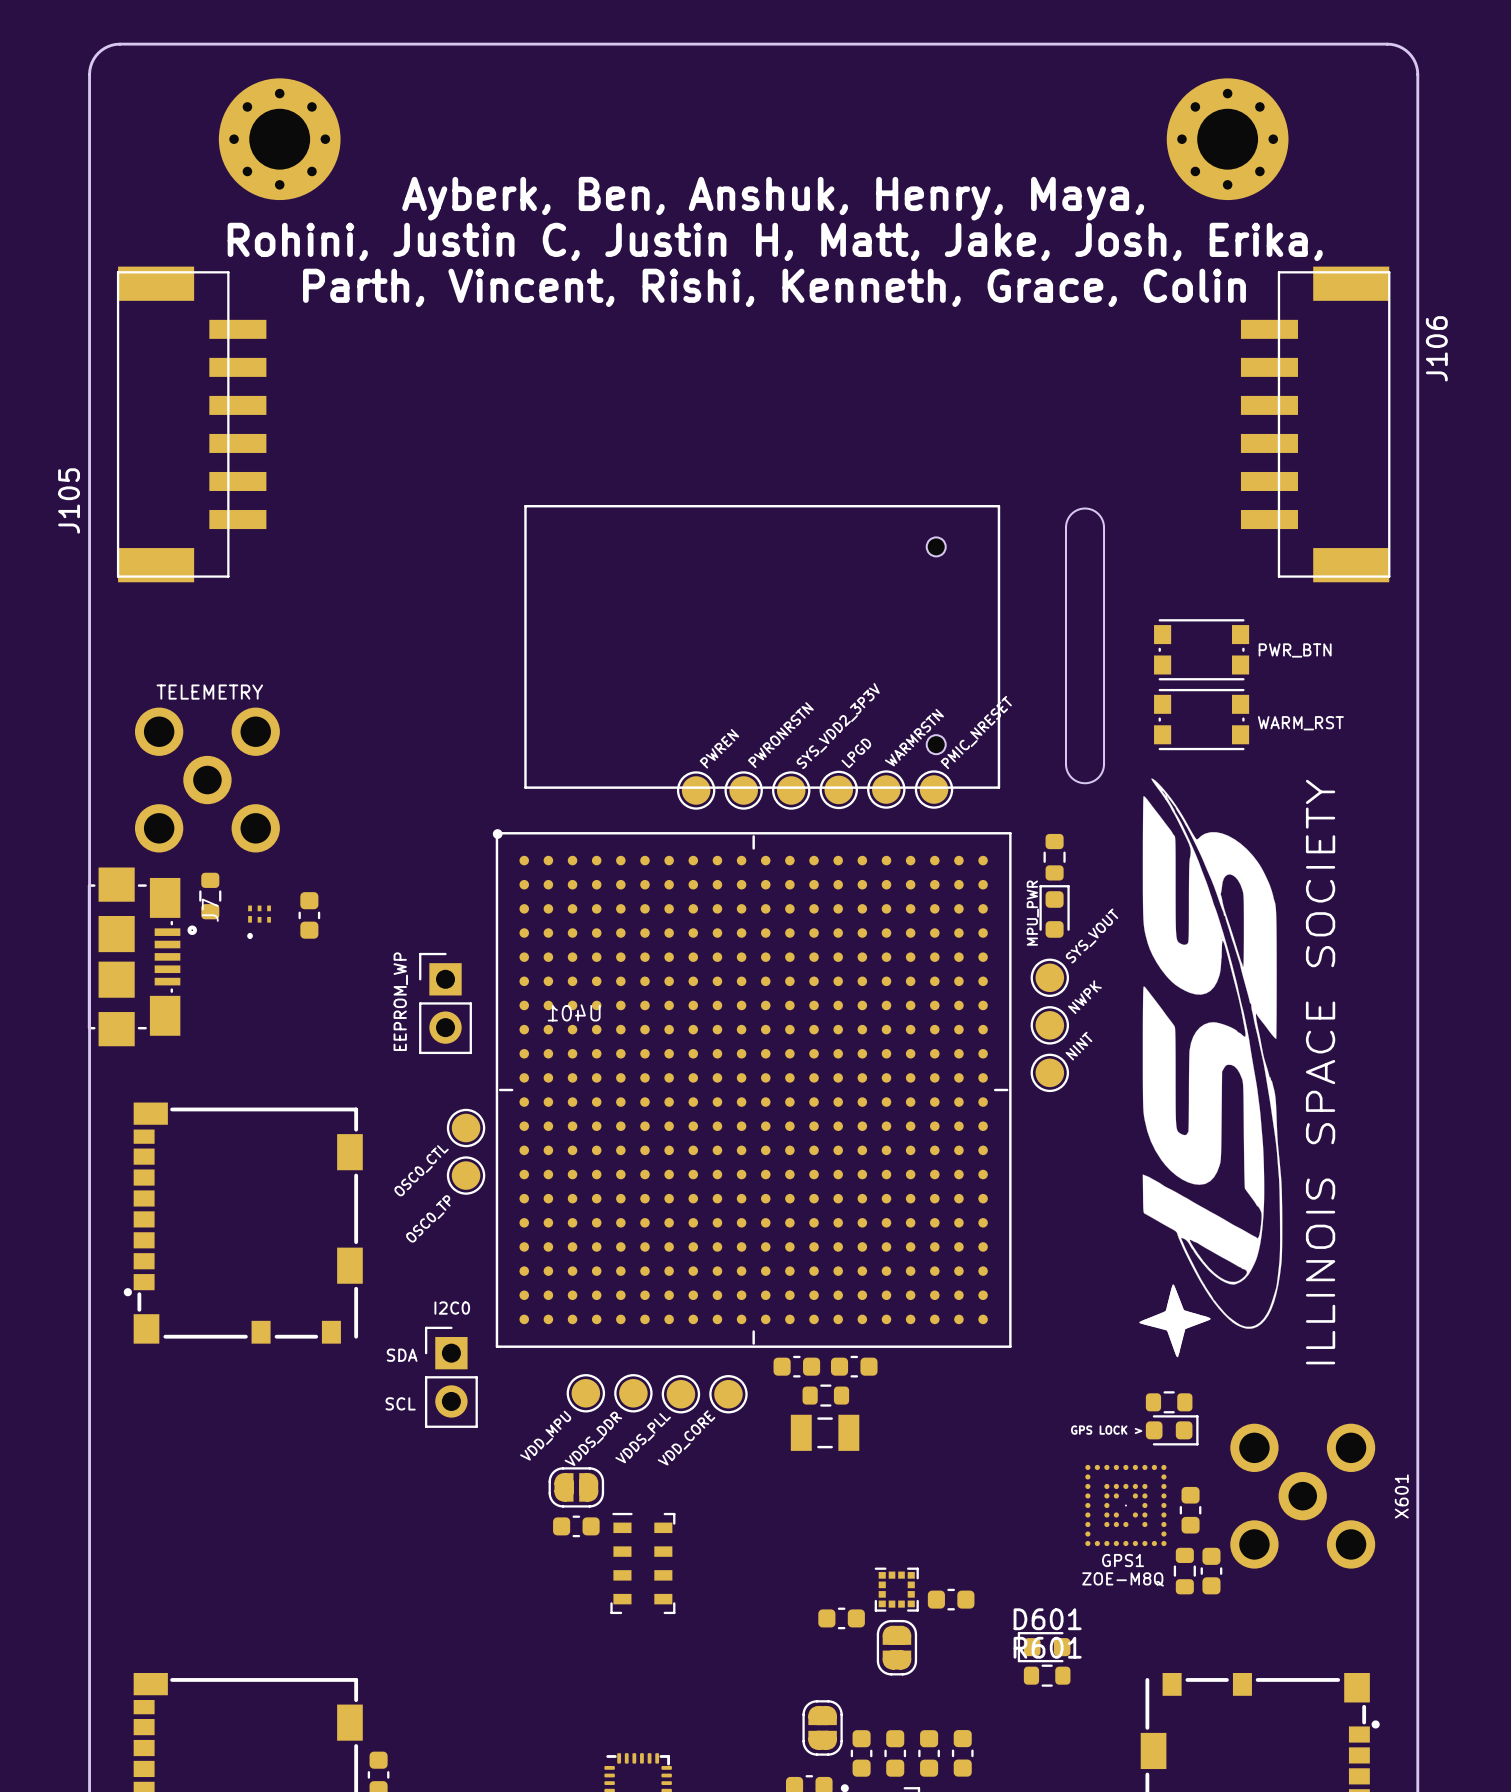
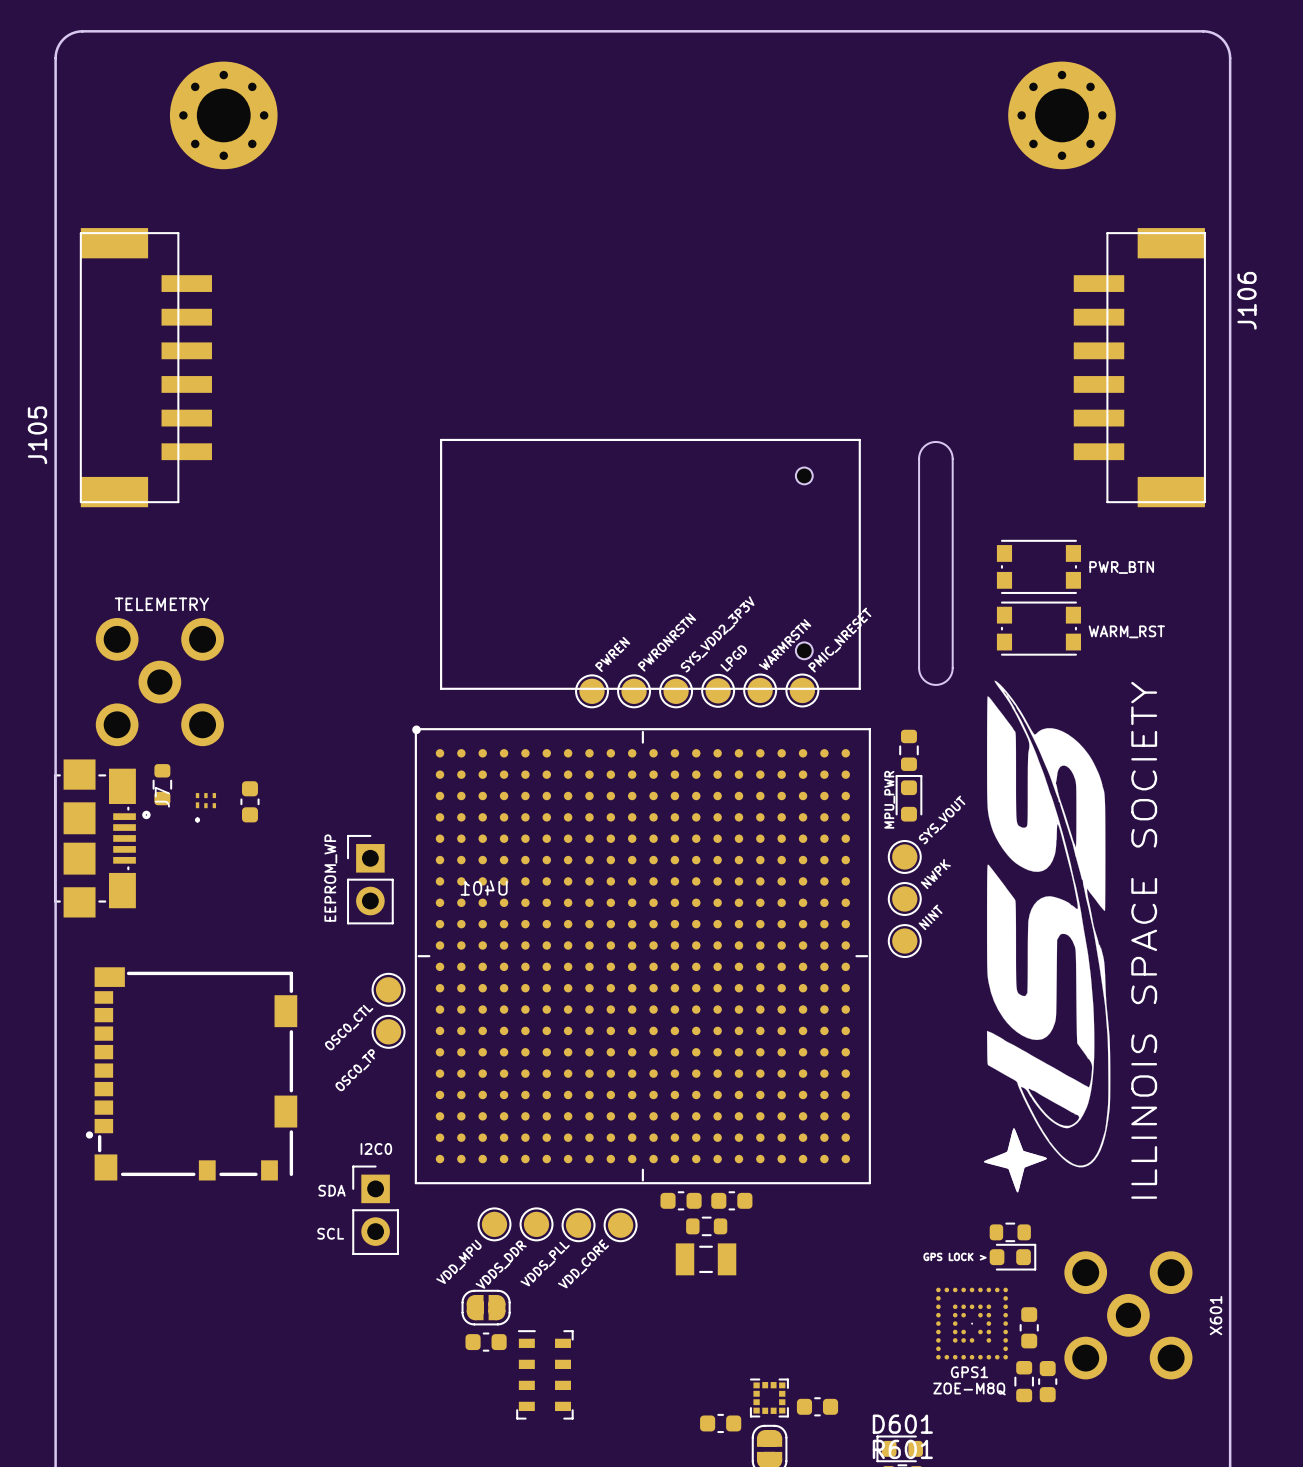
text: Ayberk, Ben, Anshuk, Henry, Maya, (773, 198) -> none
text: Rohini, Justin C, Justin H, Matt, Jake, Josh, Erika, (775, 241) -> none
text: Parth, Vincent, Rishi, Kenneth, Grace, Colin (774, 287) -> none

